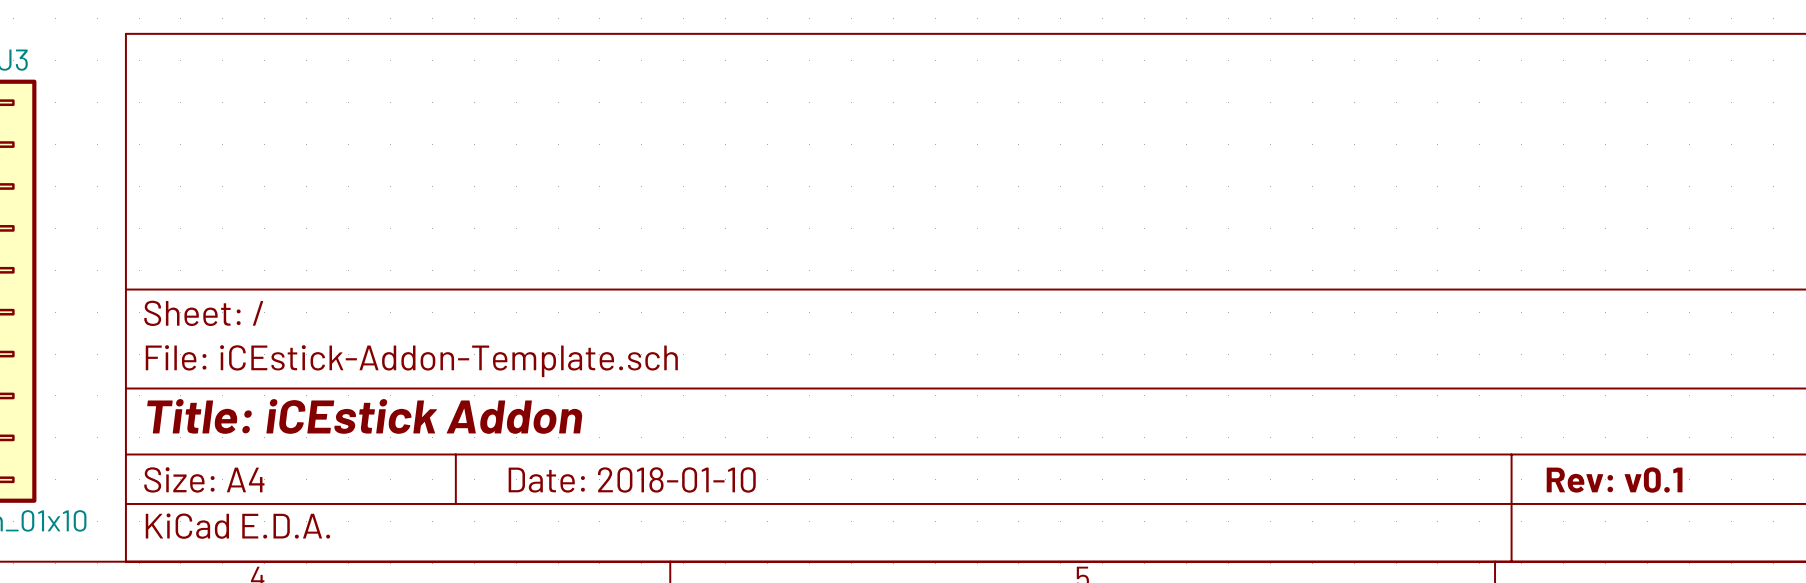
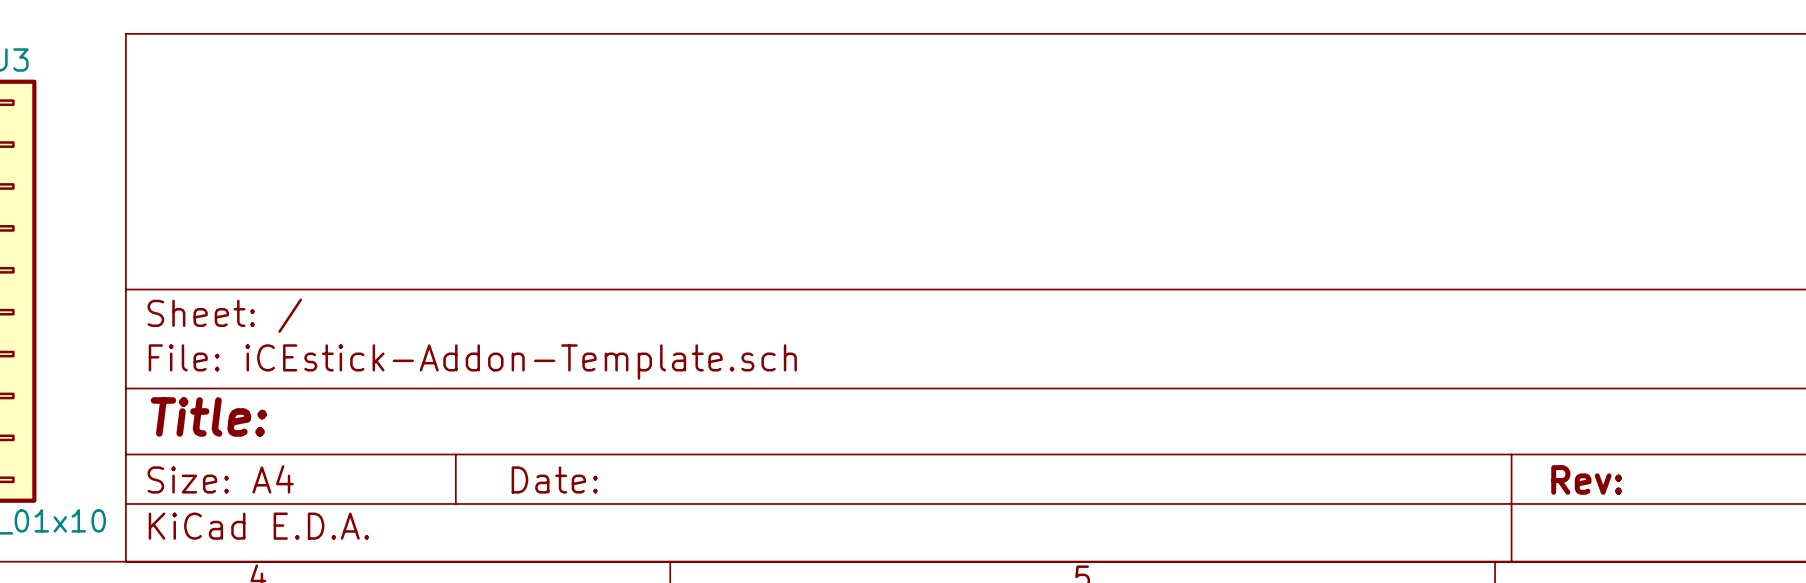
title block: Title: iCEstick Addon (364, 416) -> Title: (208, 416)
title block: Date: 2018-01-10 (632, 479) -> Date: (554, 479)
title block: Rev: v0.1 (1614, 480) -> Rev: (1586, 479)

